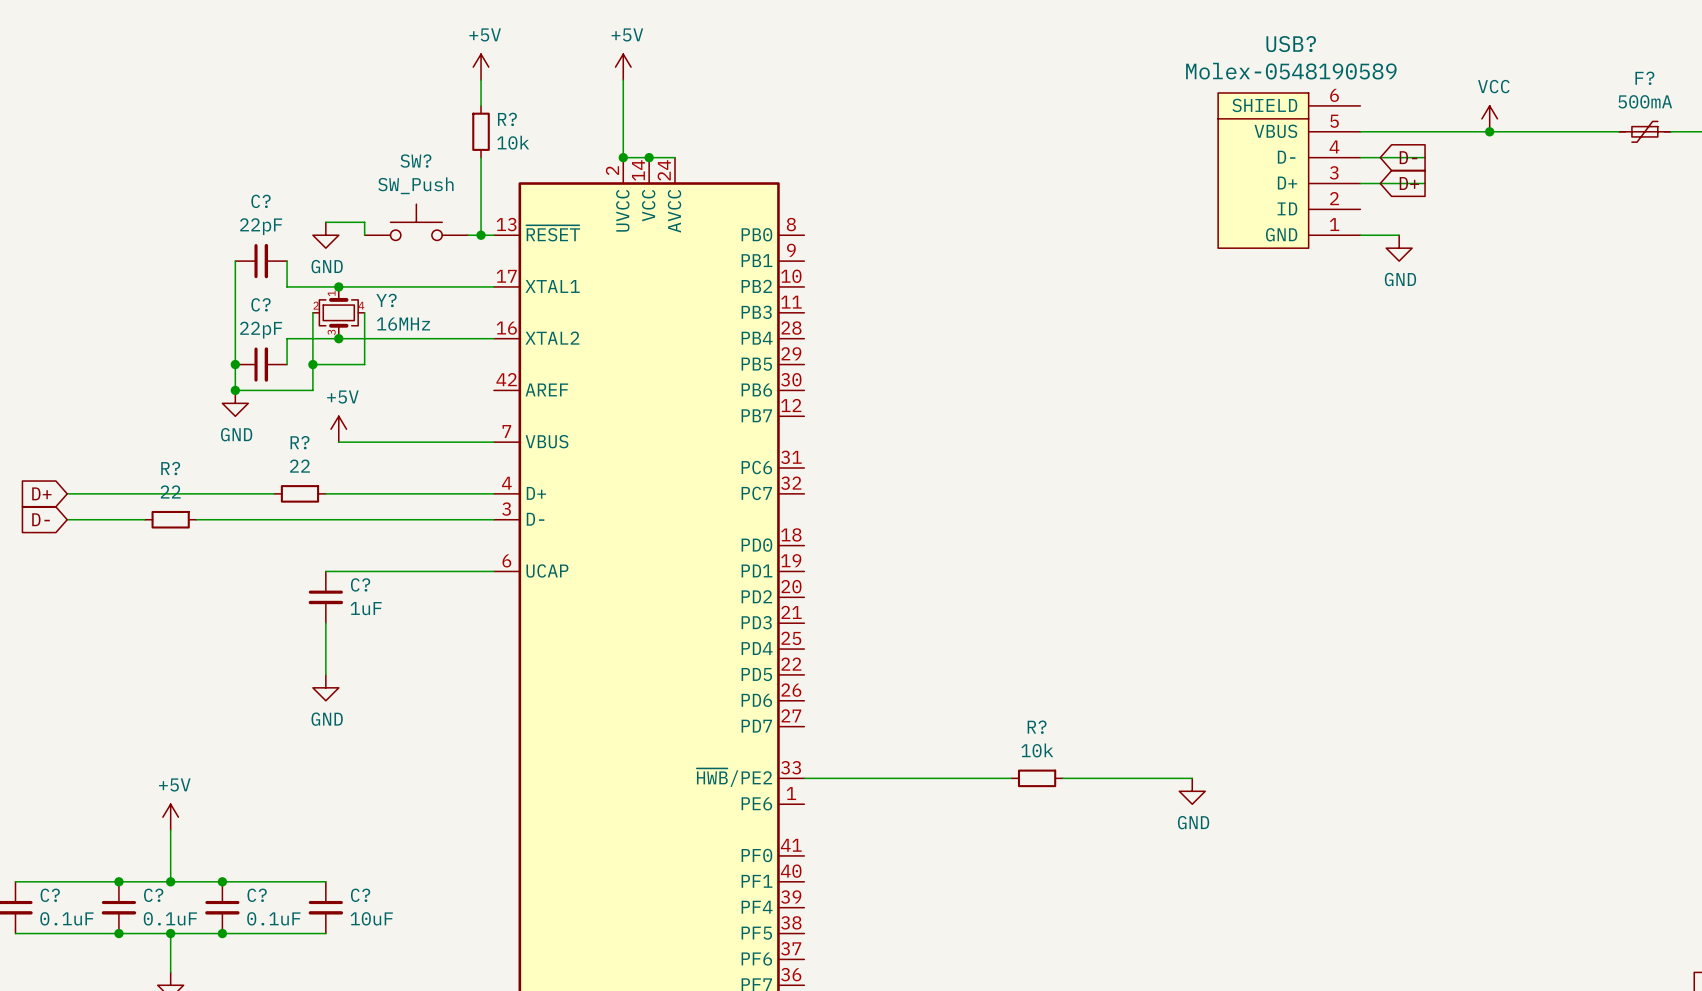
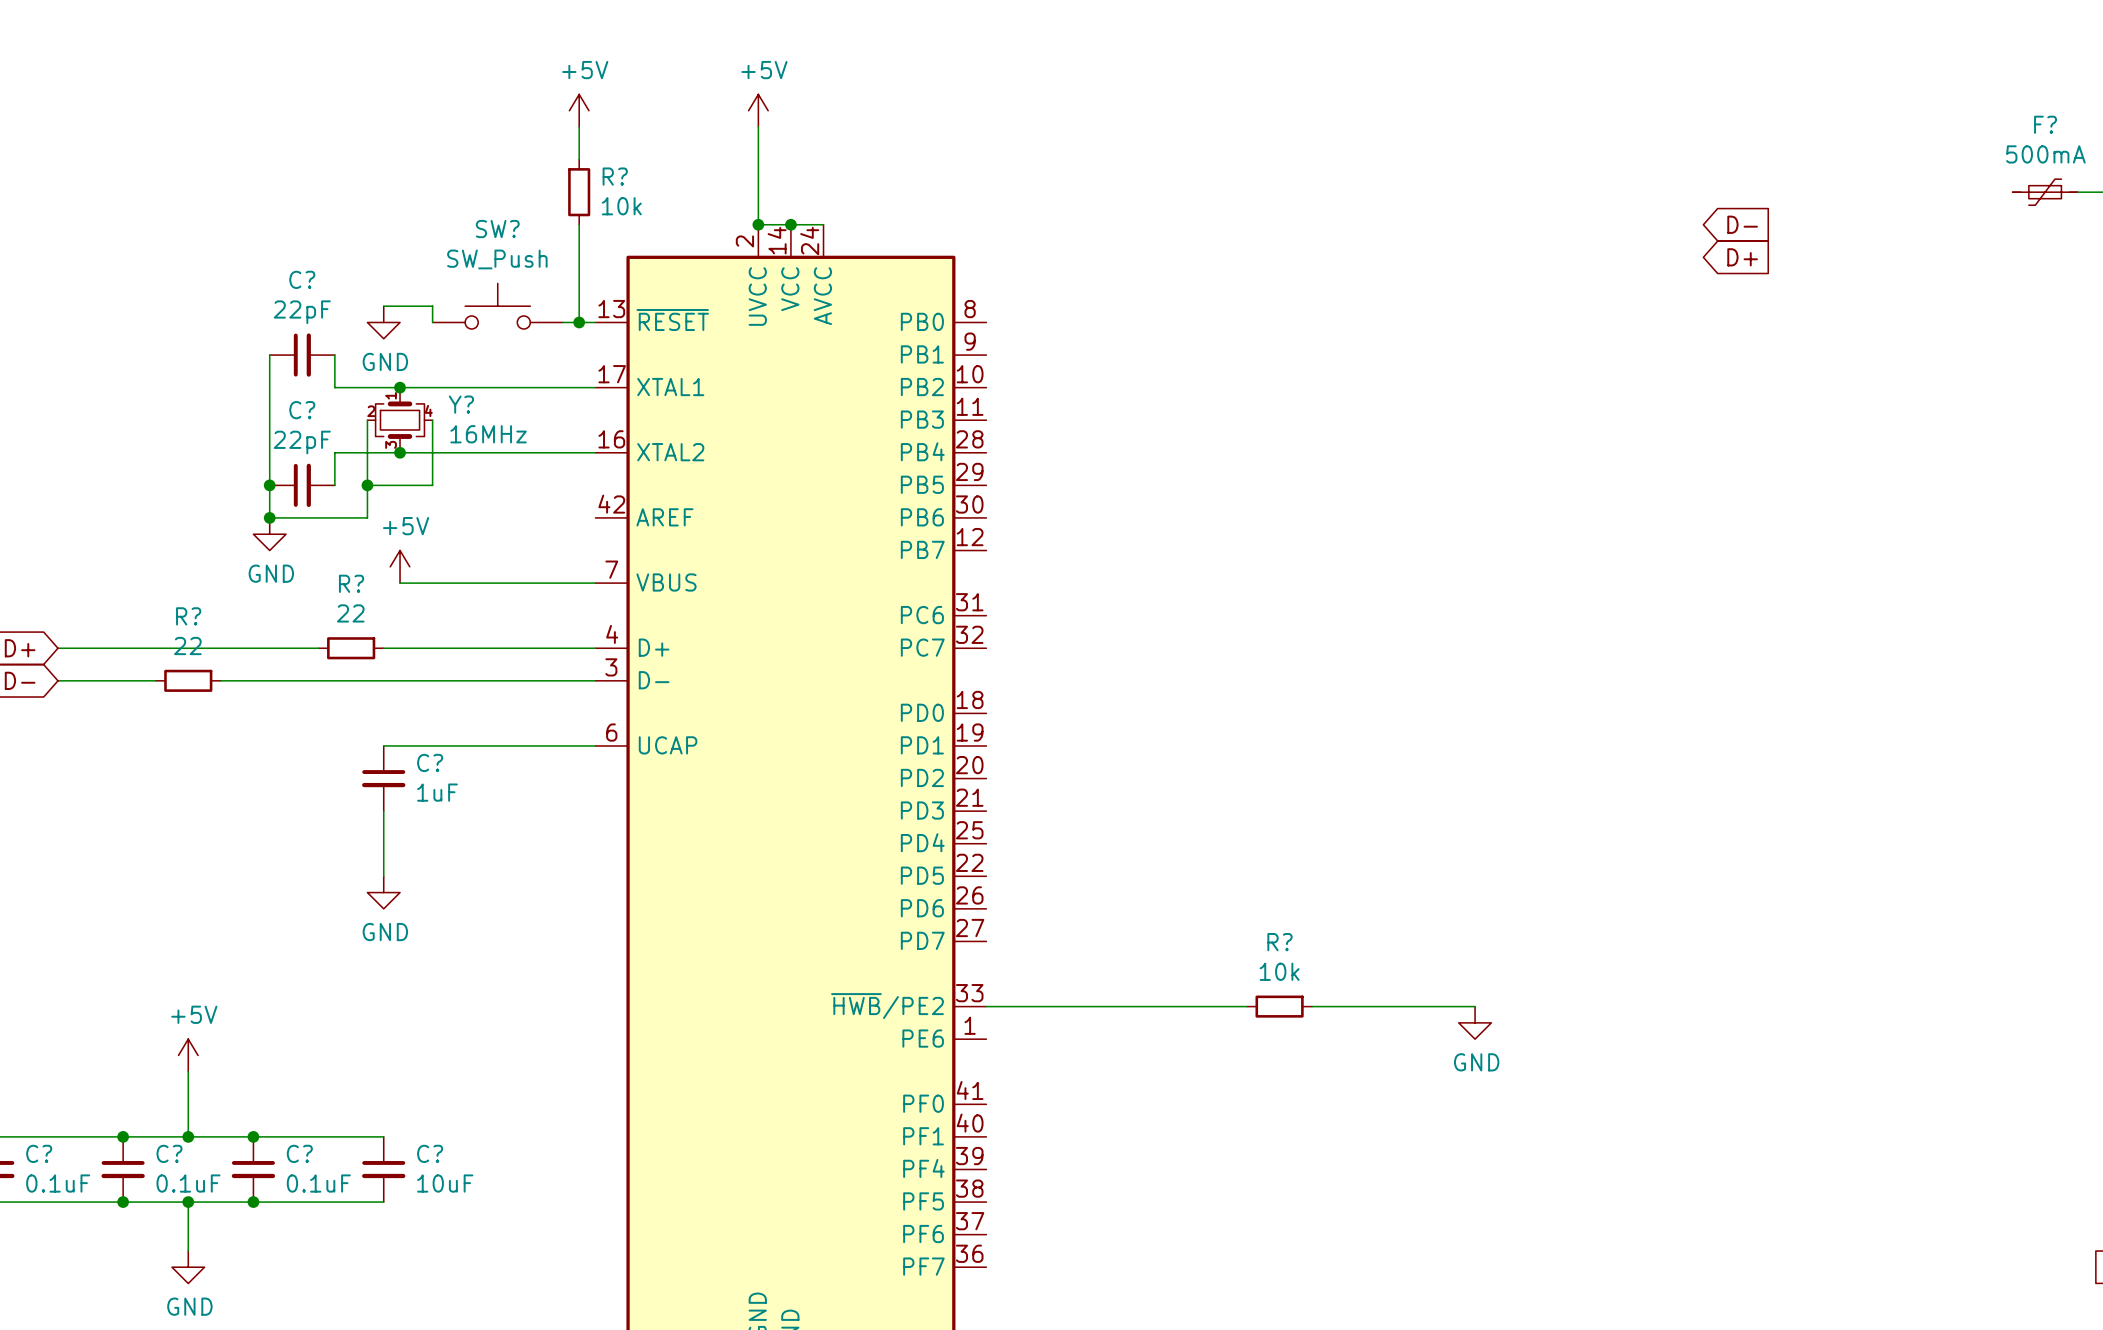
power symbol: VCC (1489, 118) -> none
wire: (1360, 131) (1619, 131) -> none
junction: (1489, 131) -> none
wire: (1360, 157) (1425, 157) -> none
USB?: Molex-0548190589 (1289, 170) -> none
wire: (1360, 183) (1425, 183) -> none
wire: (1360, 235) (1399, 235) -> none
power symbol: GND (1399, 248) -> none

